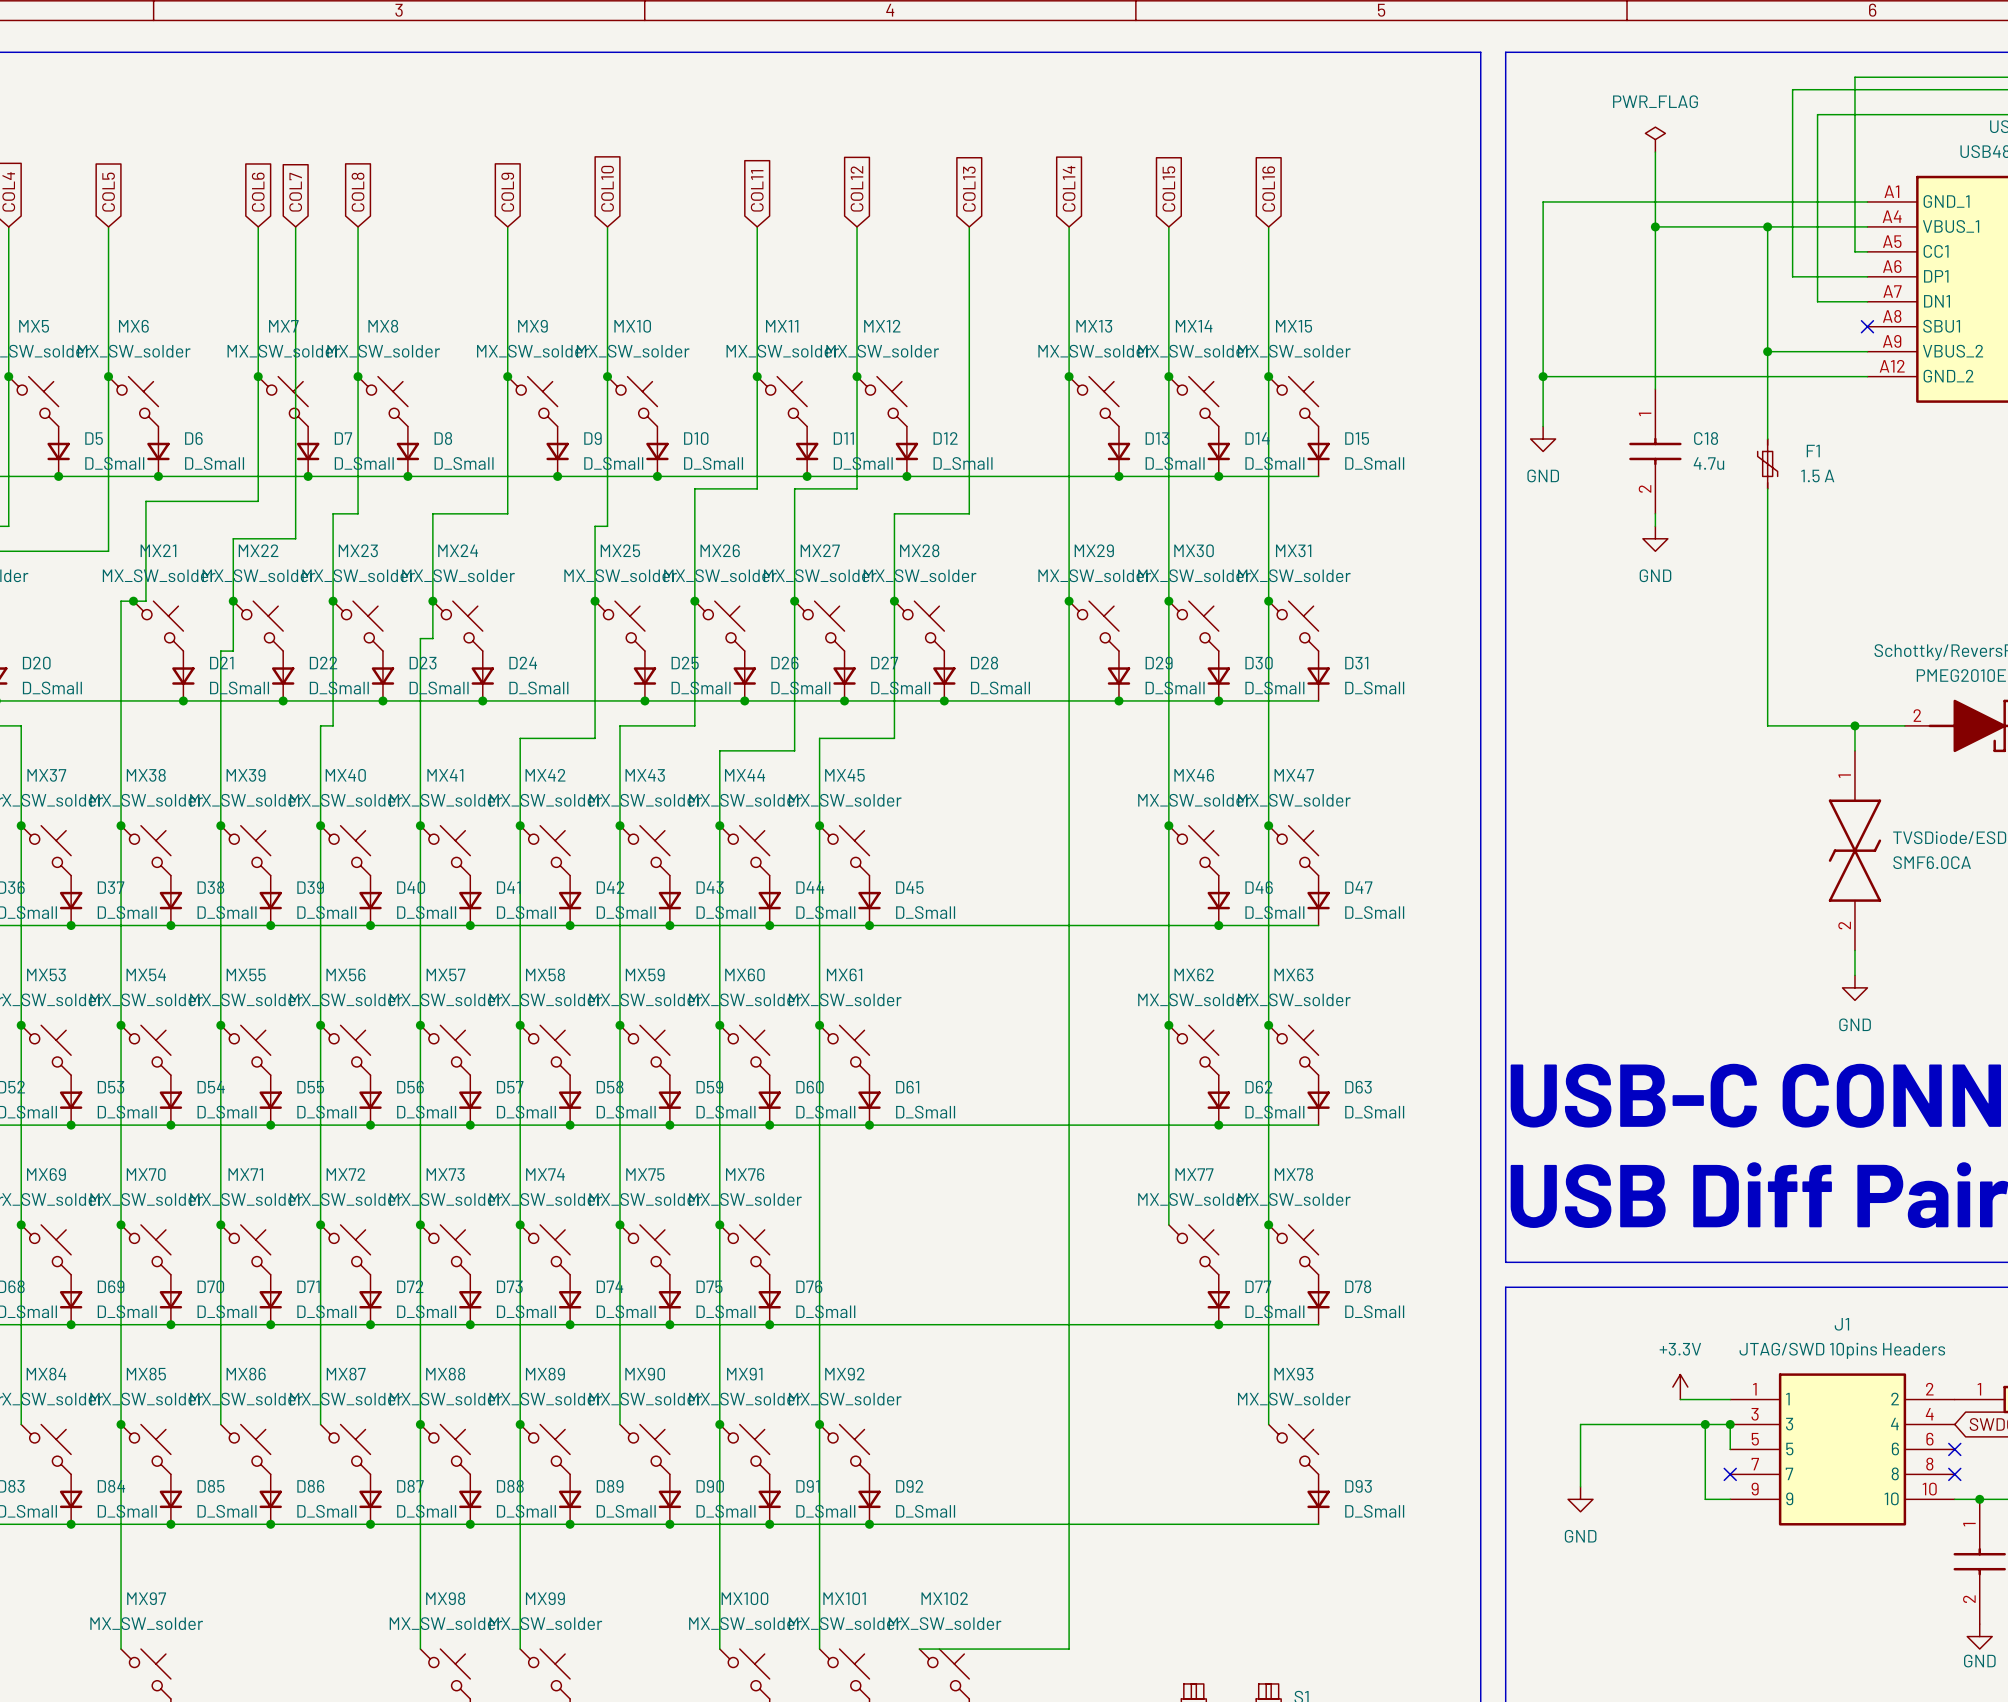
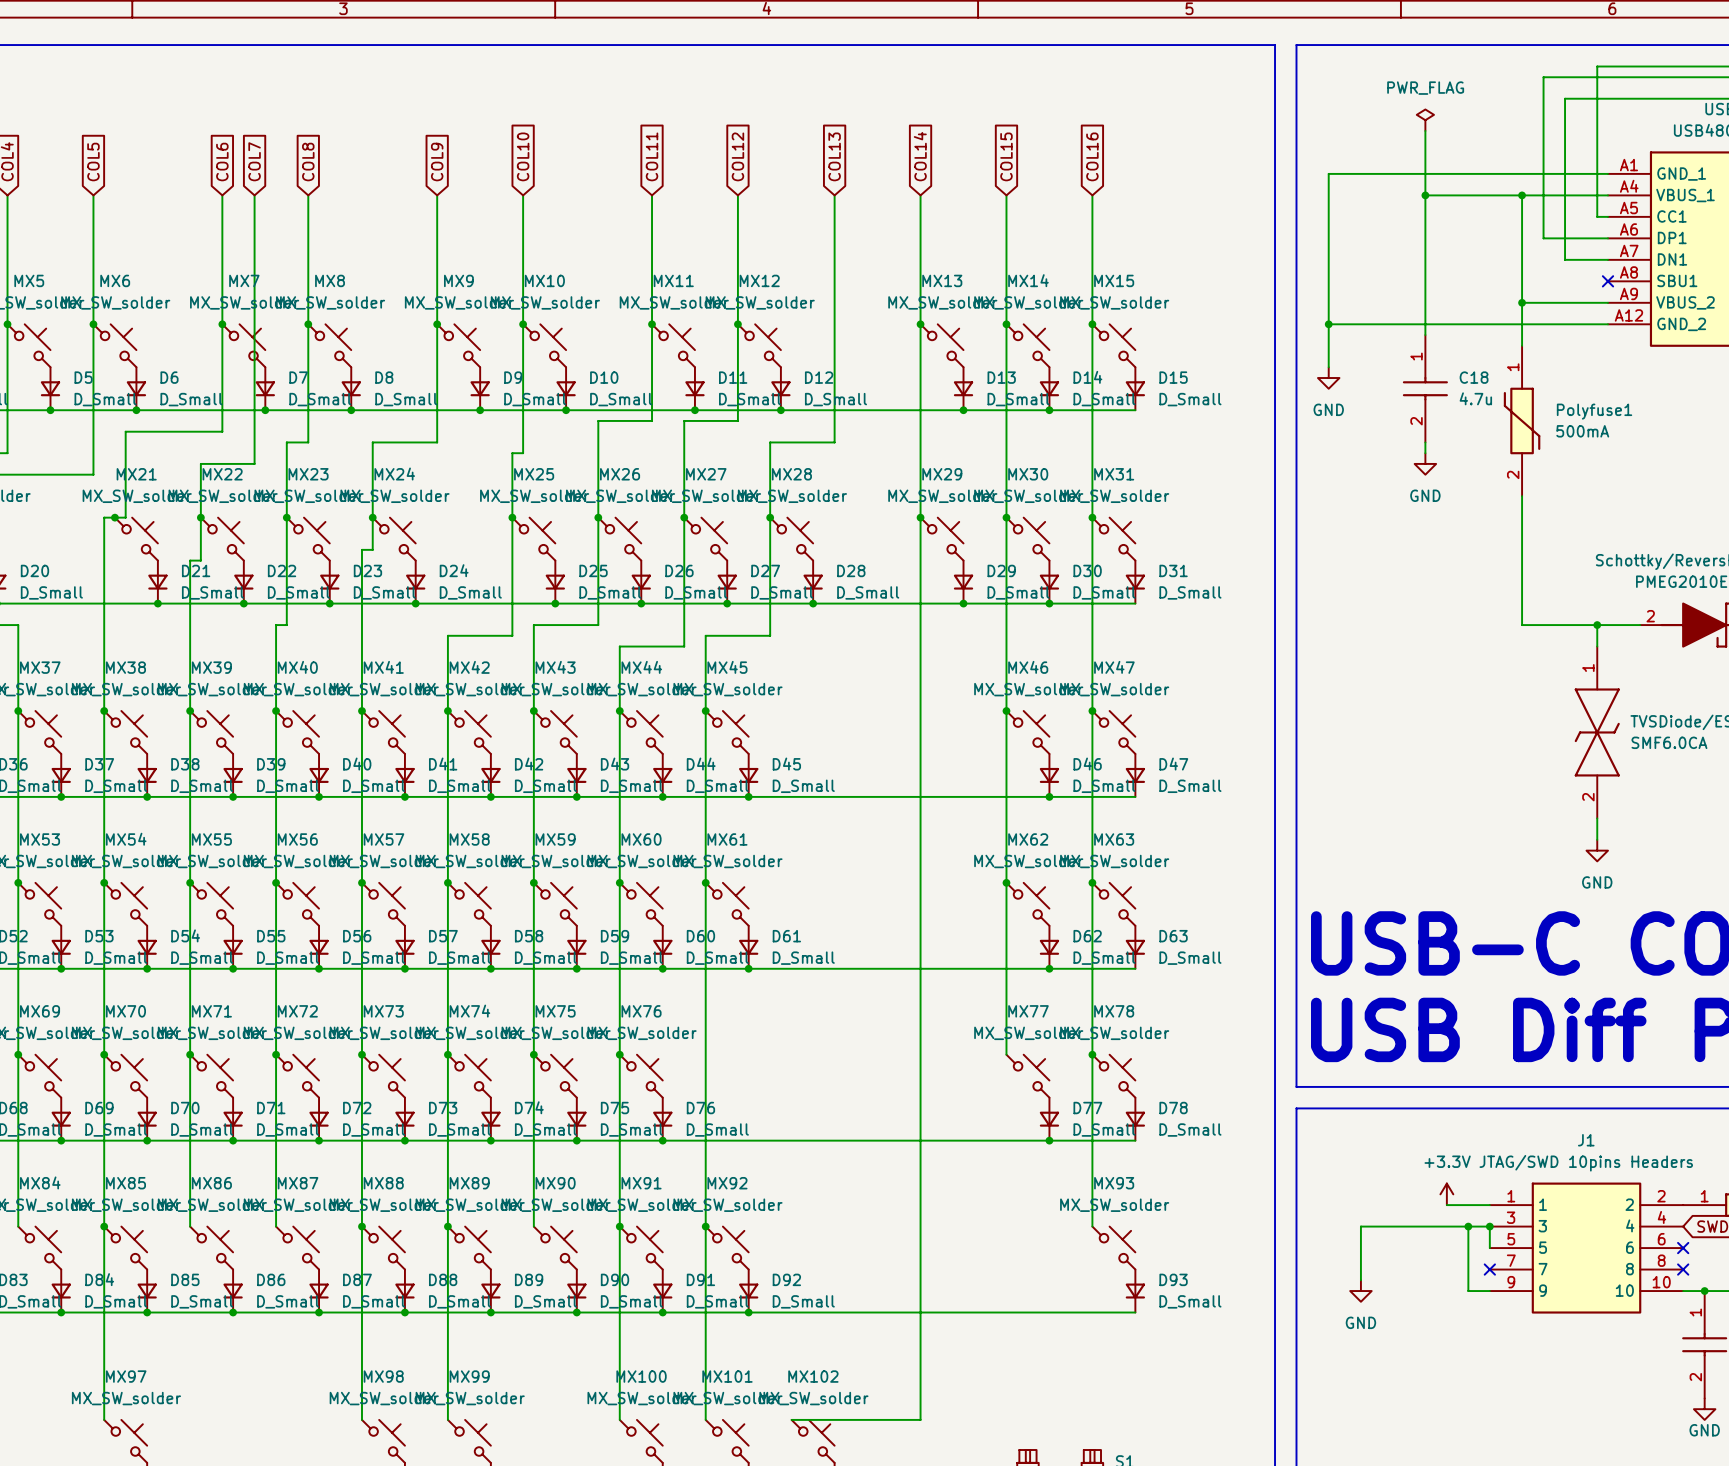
F1: (1767, 463) -> none
Polyfuse1: none -> 500mA (1522, 420)

